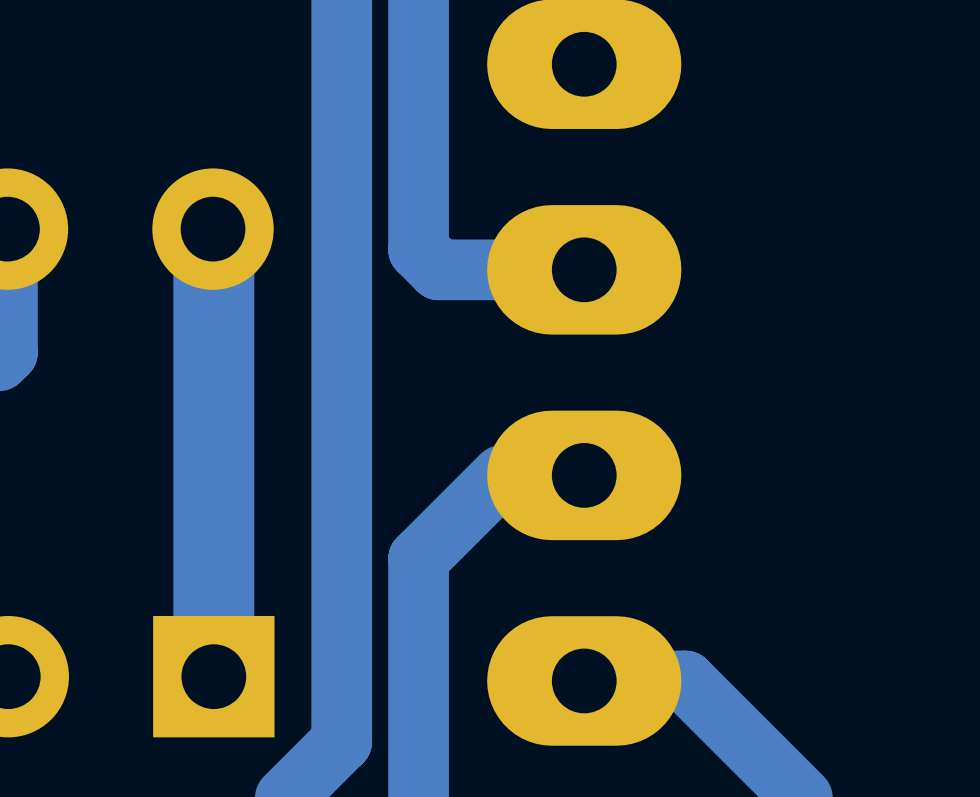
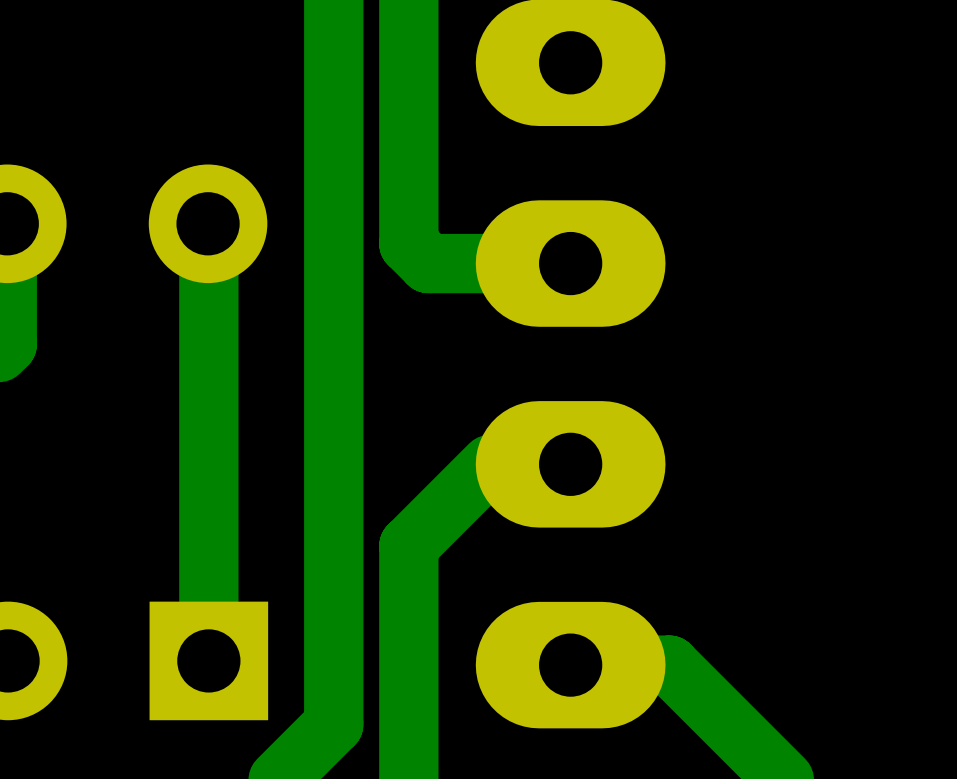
track width: thick (213, 229) (213, 676) -> thin (208, 224) (208, 660)

